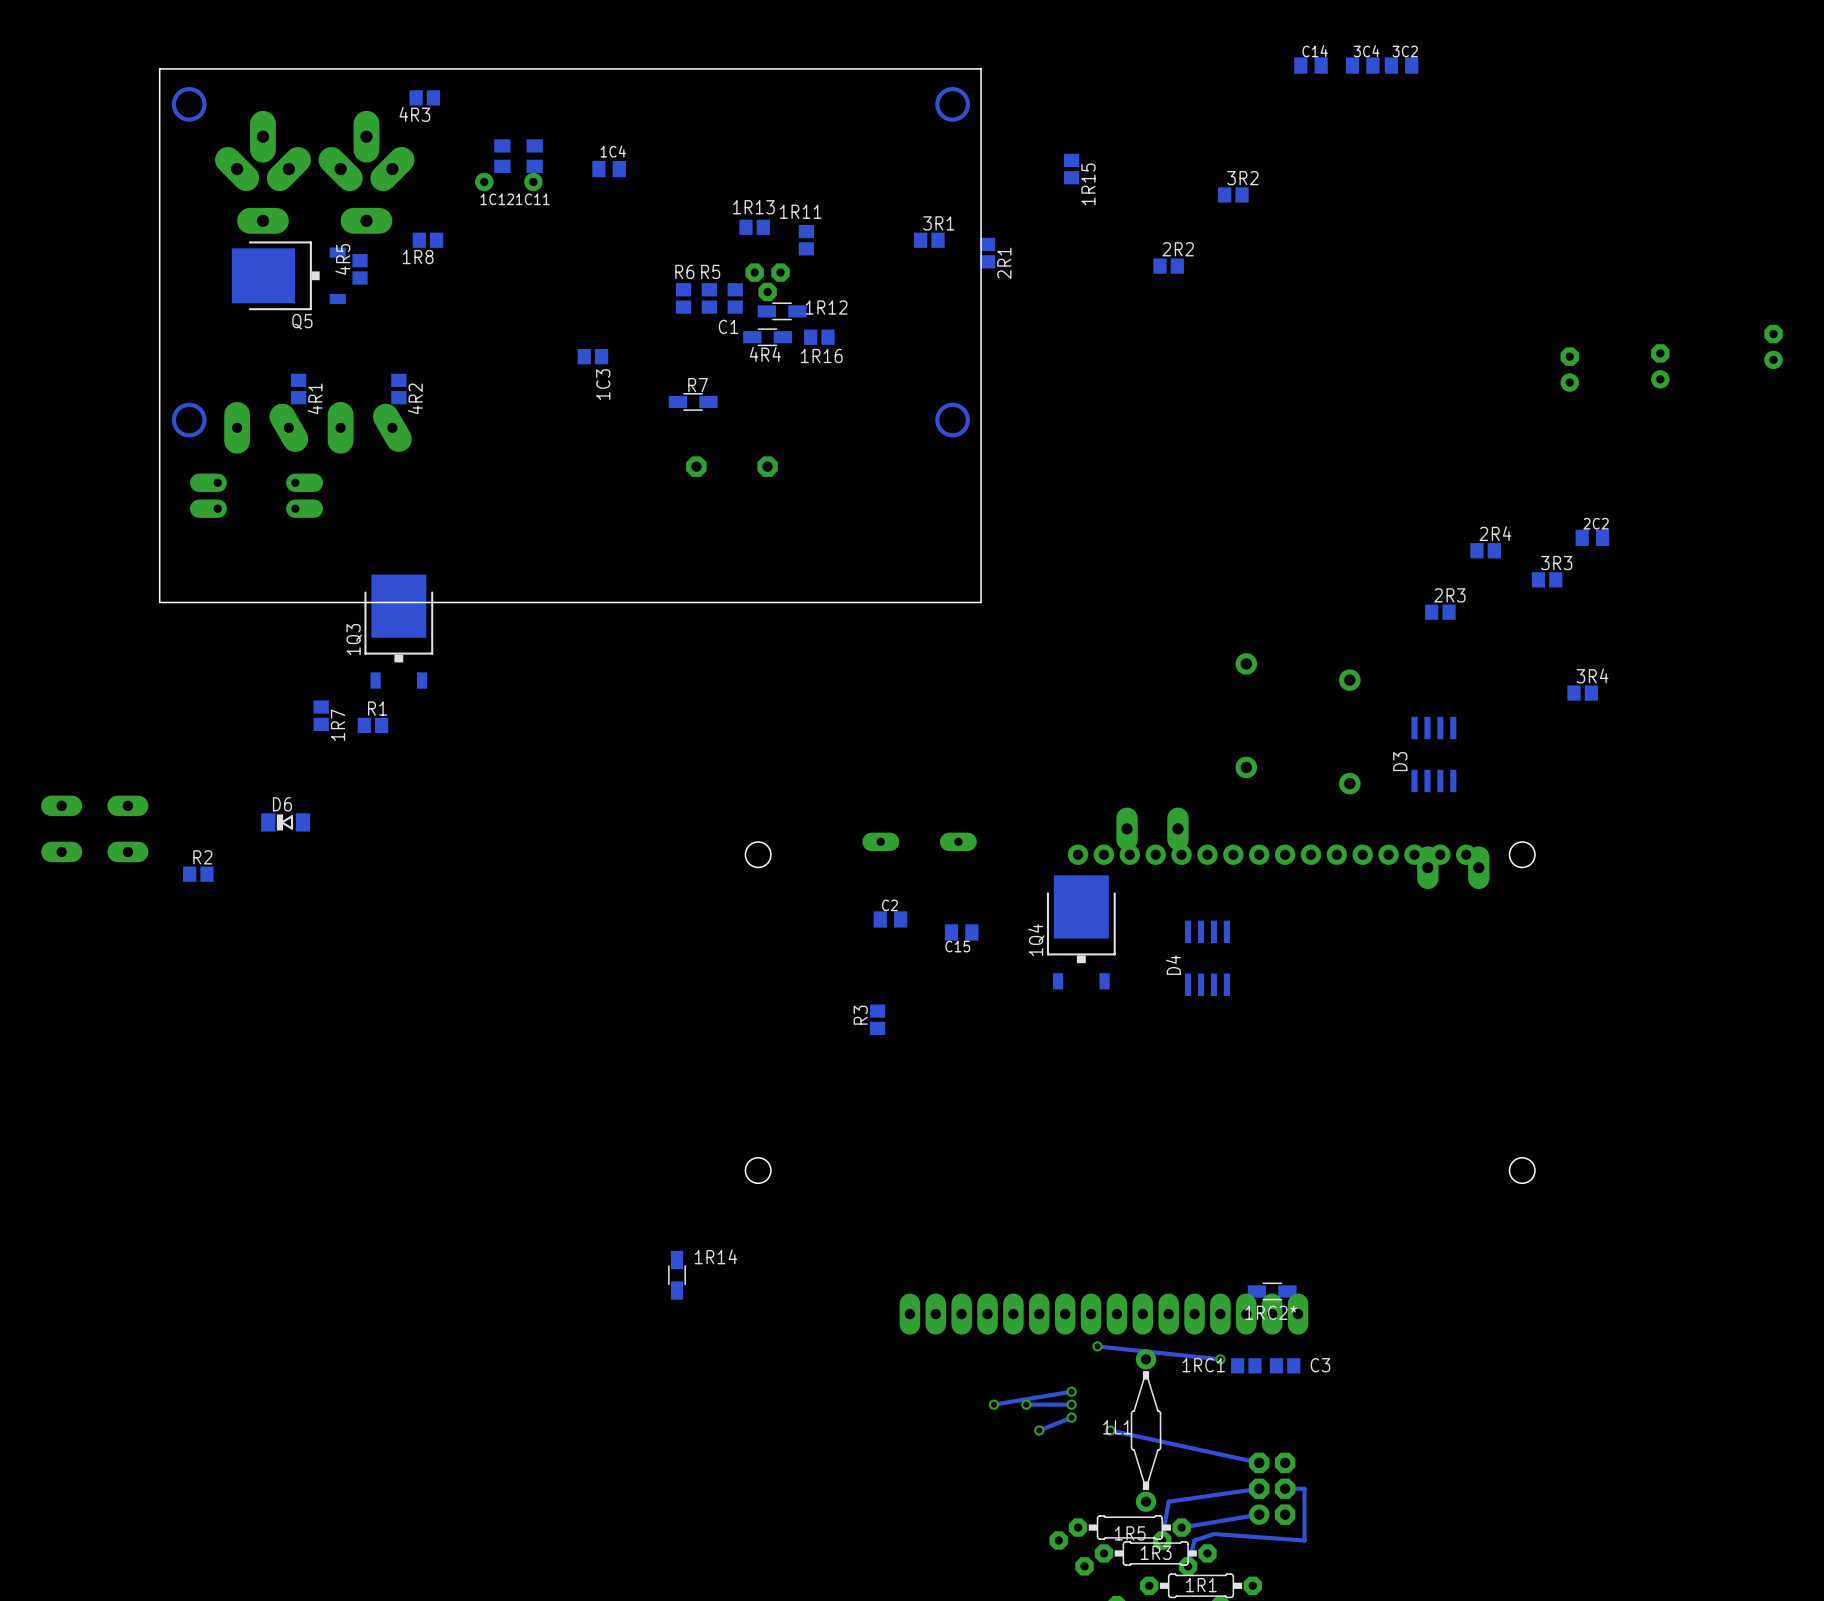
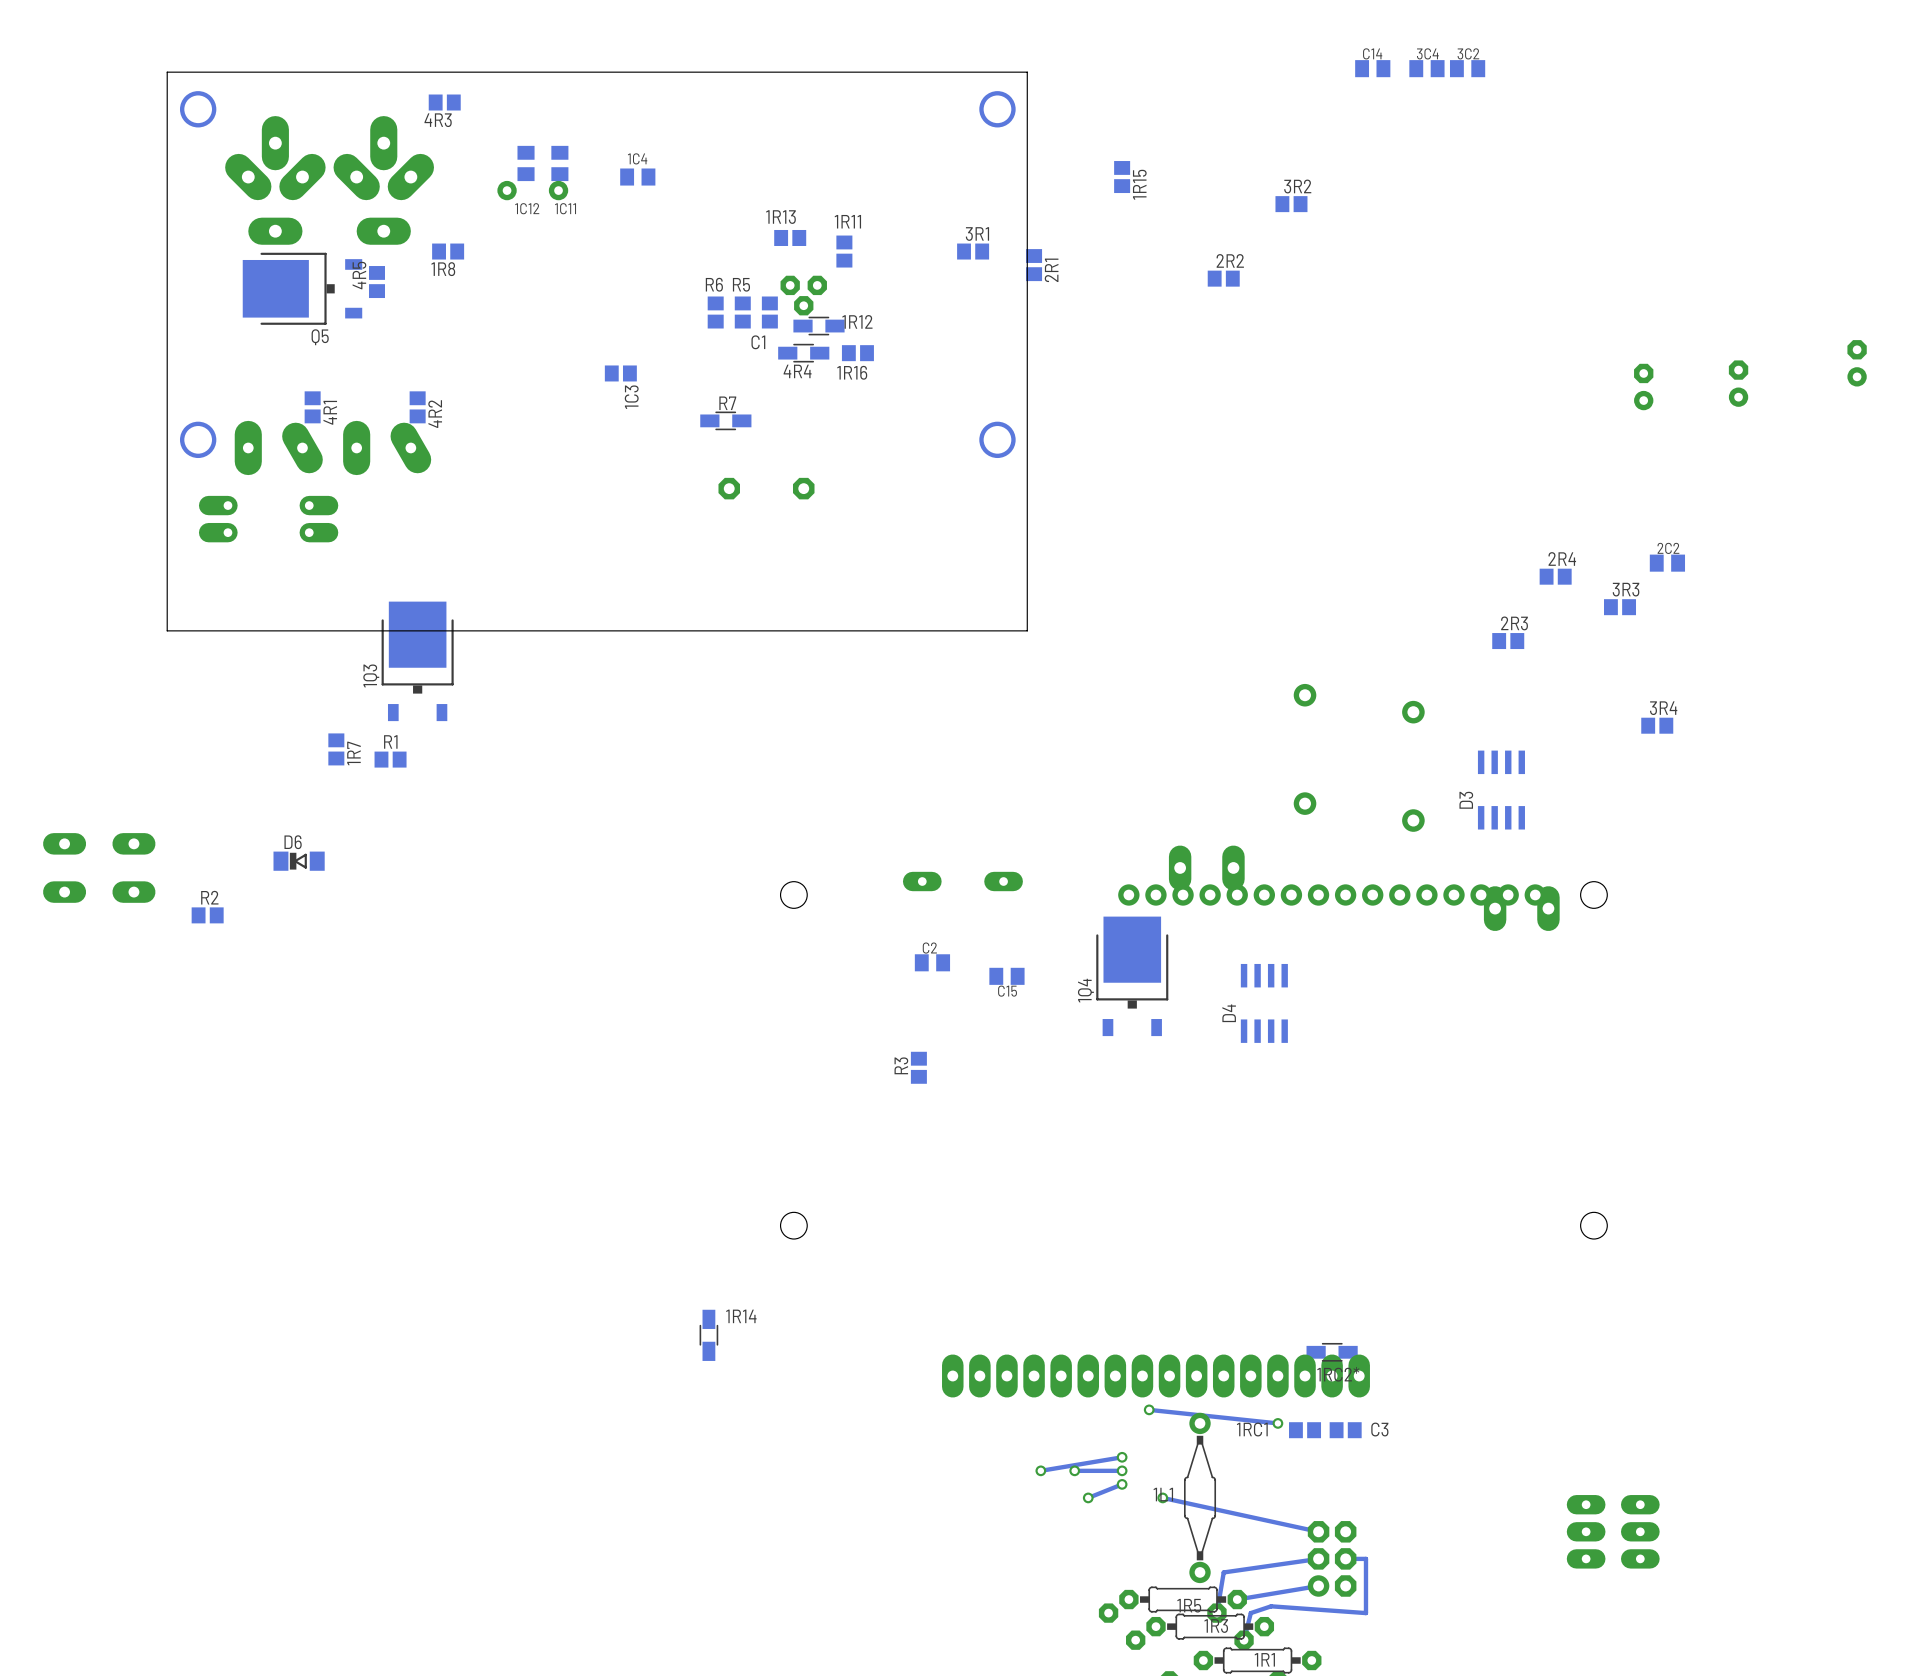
part: none -> (1613, 1531)

